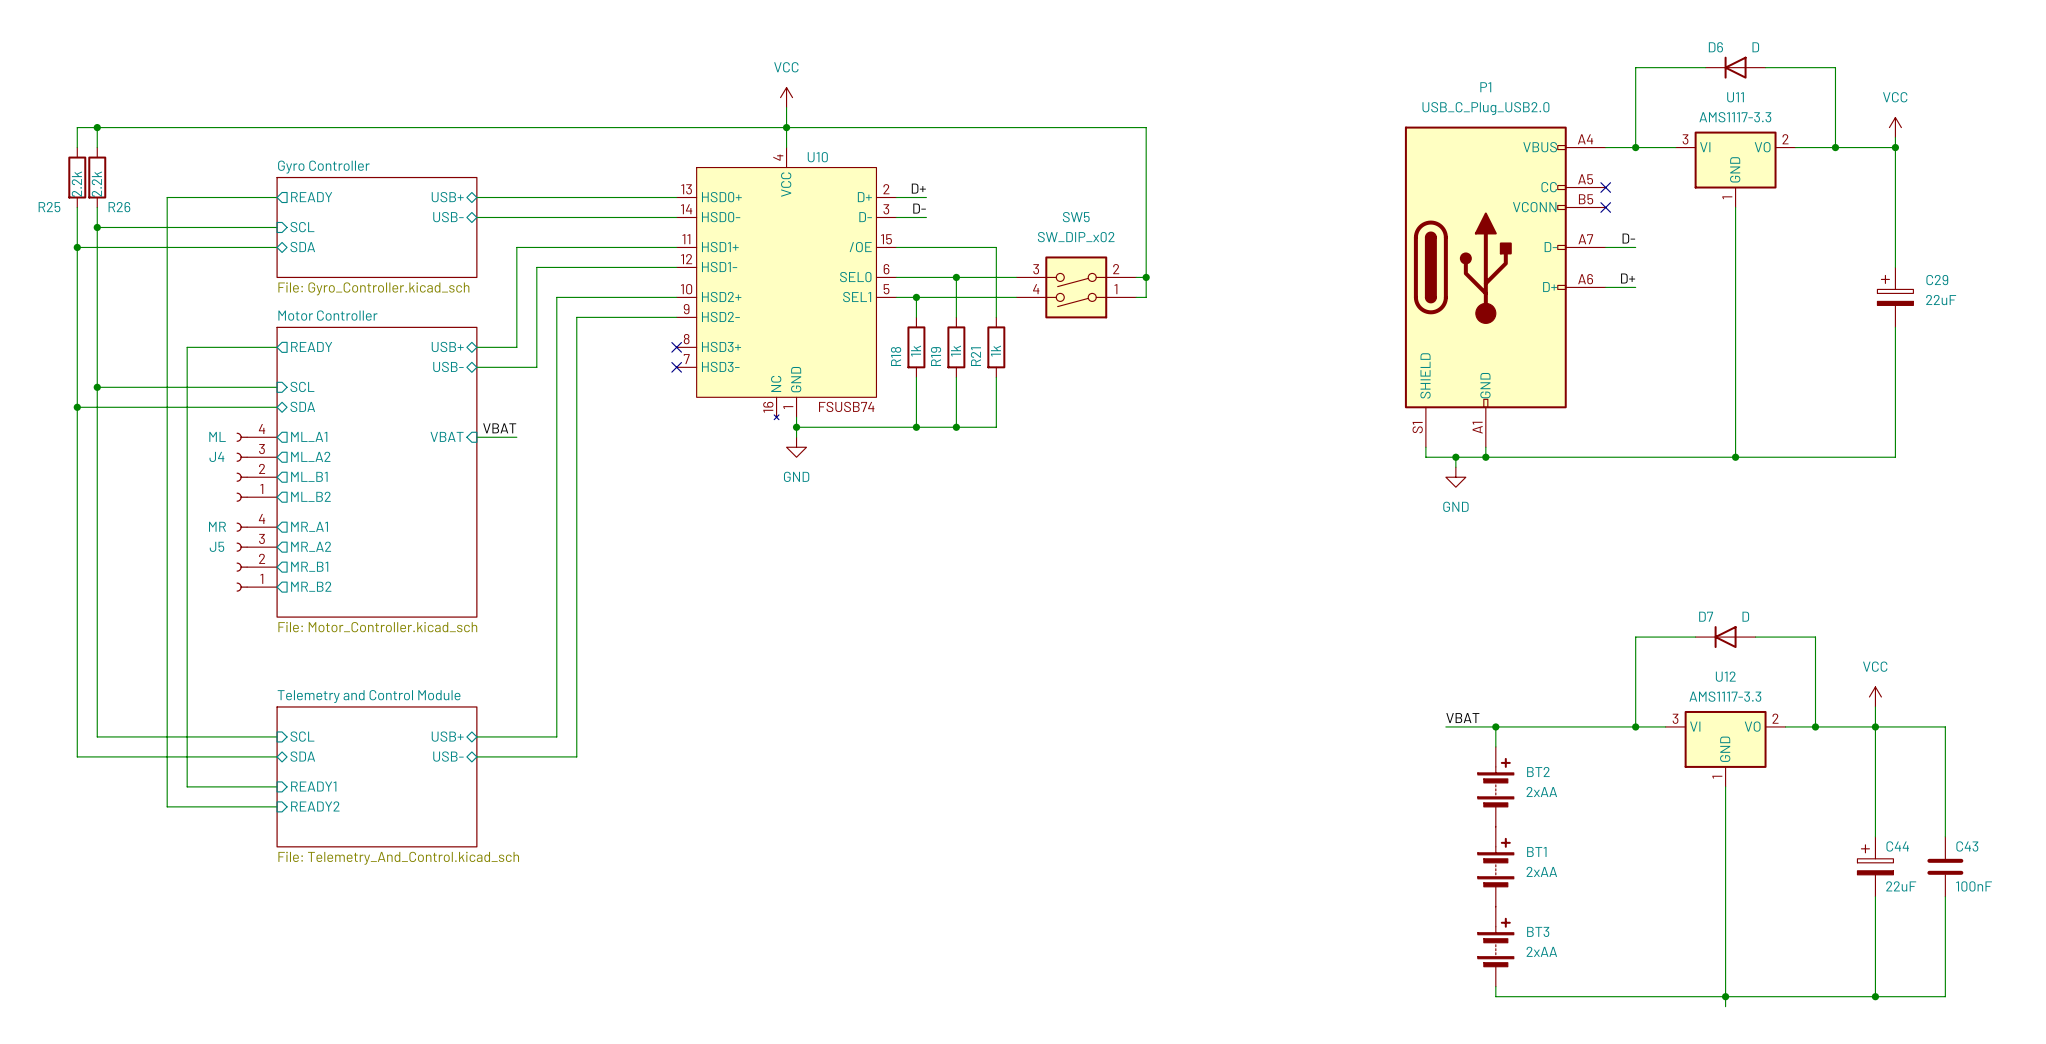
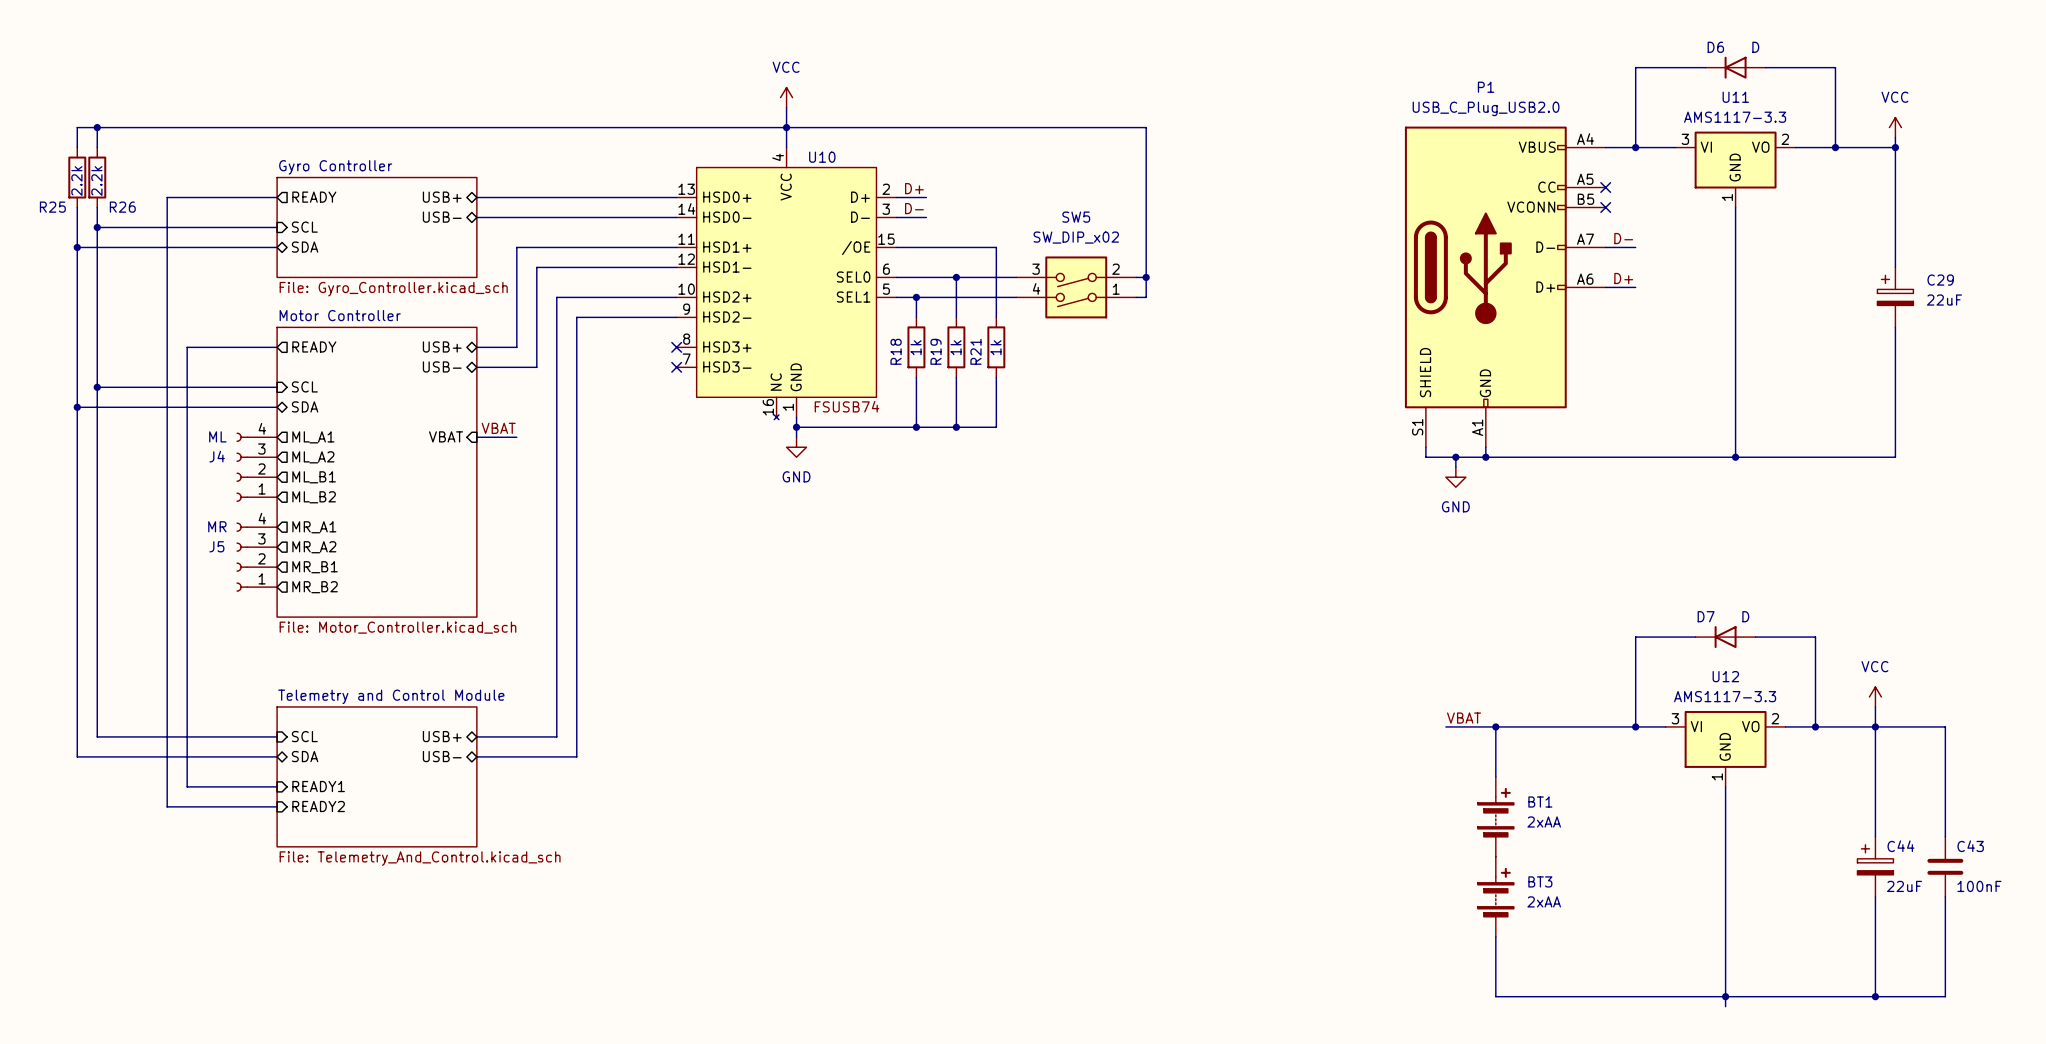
BT2: 2xAA (1495, 786) -> none
BT1 position: (1495, 866) -> (1495, 816)
BT3 position: (1495, 946) -> (1495, 896)

